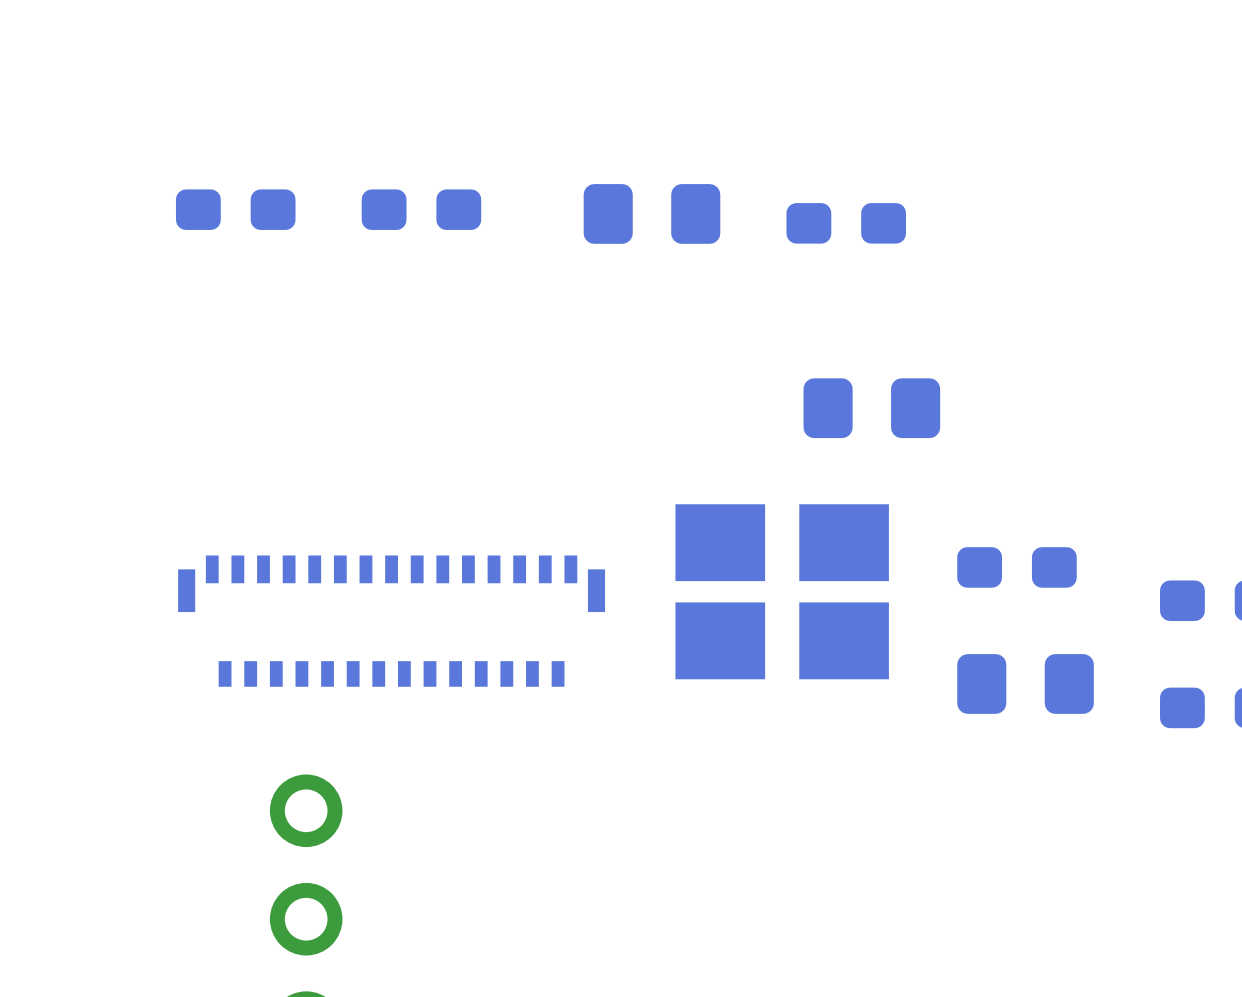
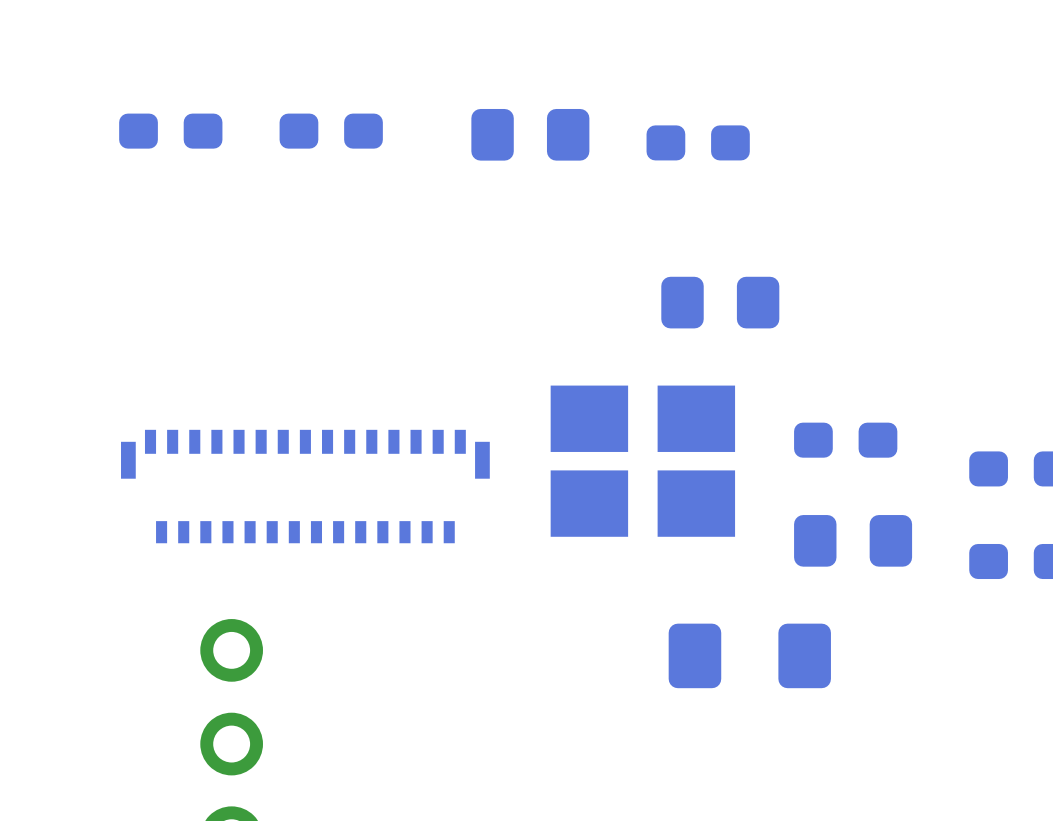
part: none -> (749, 655)

